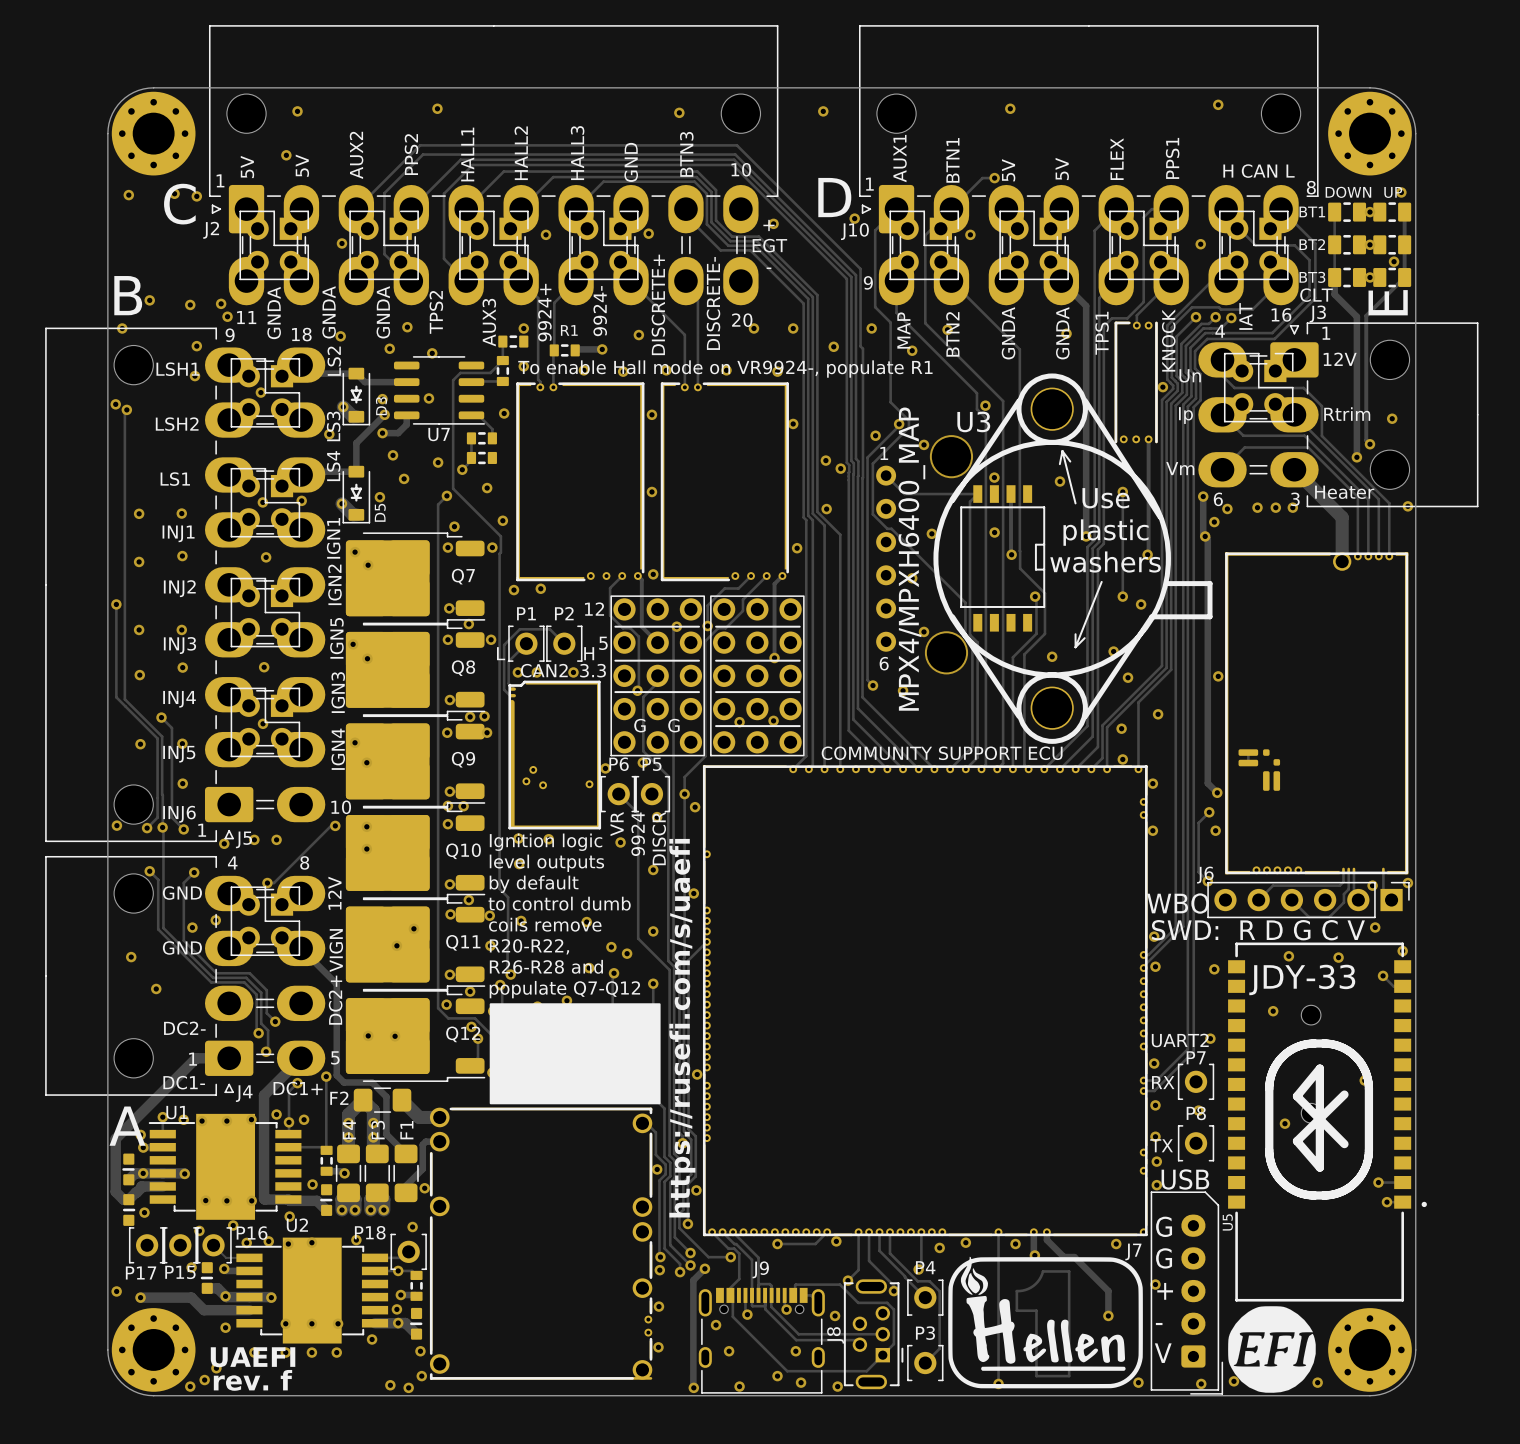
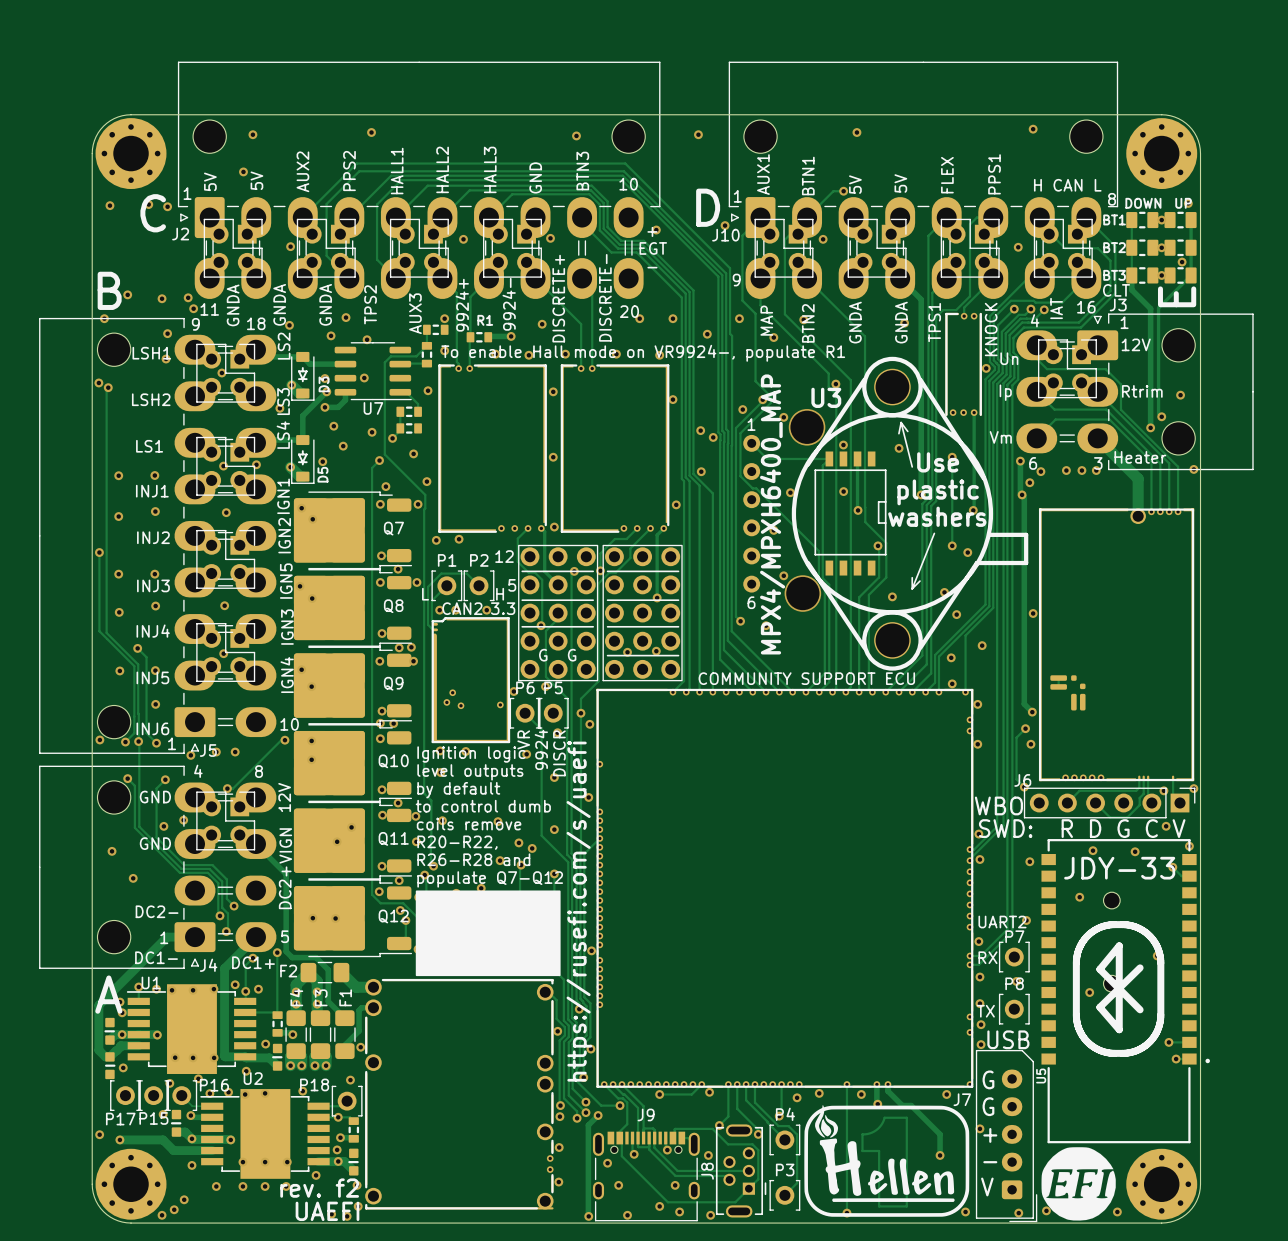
text position: UAEFI (253, 1357) -> UAEFI (327, 1211)
text: rev. f (252, 1380) -> rev. f2 (319, 1188)

